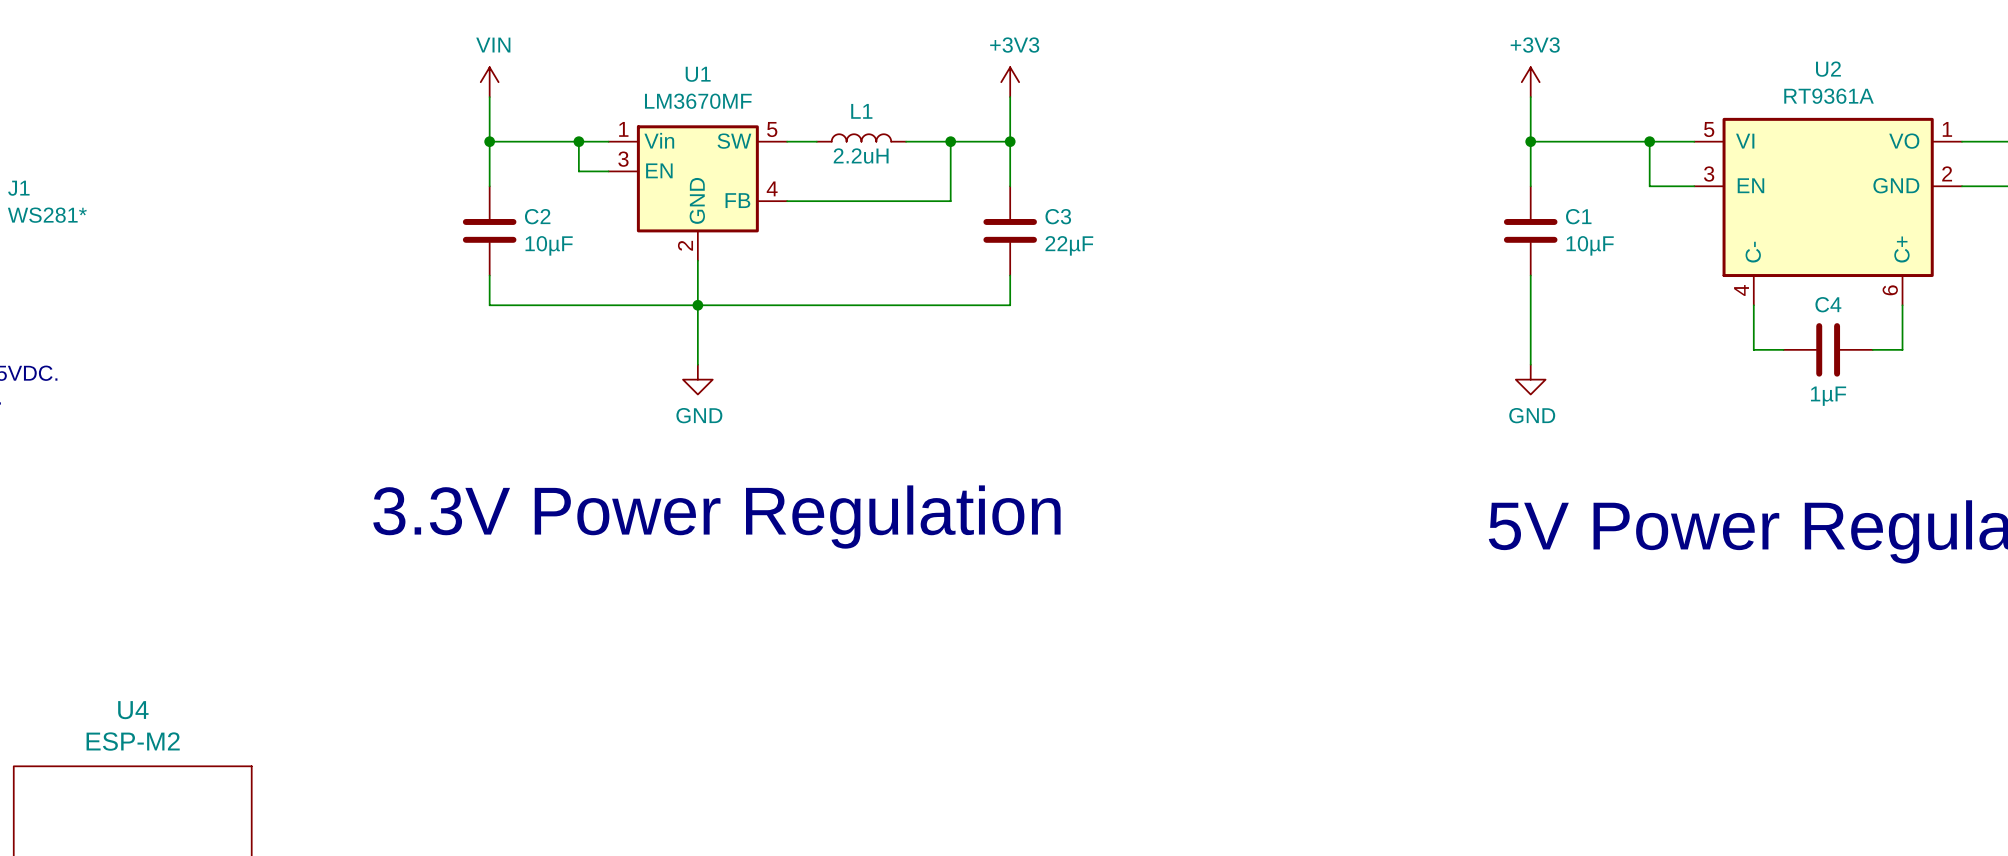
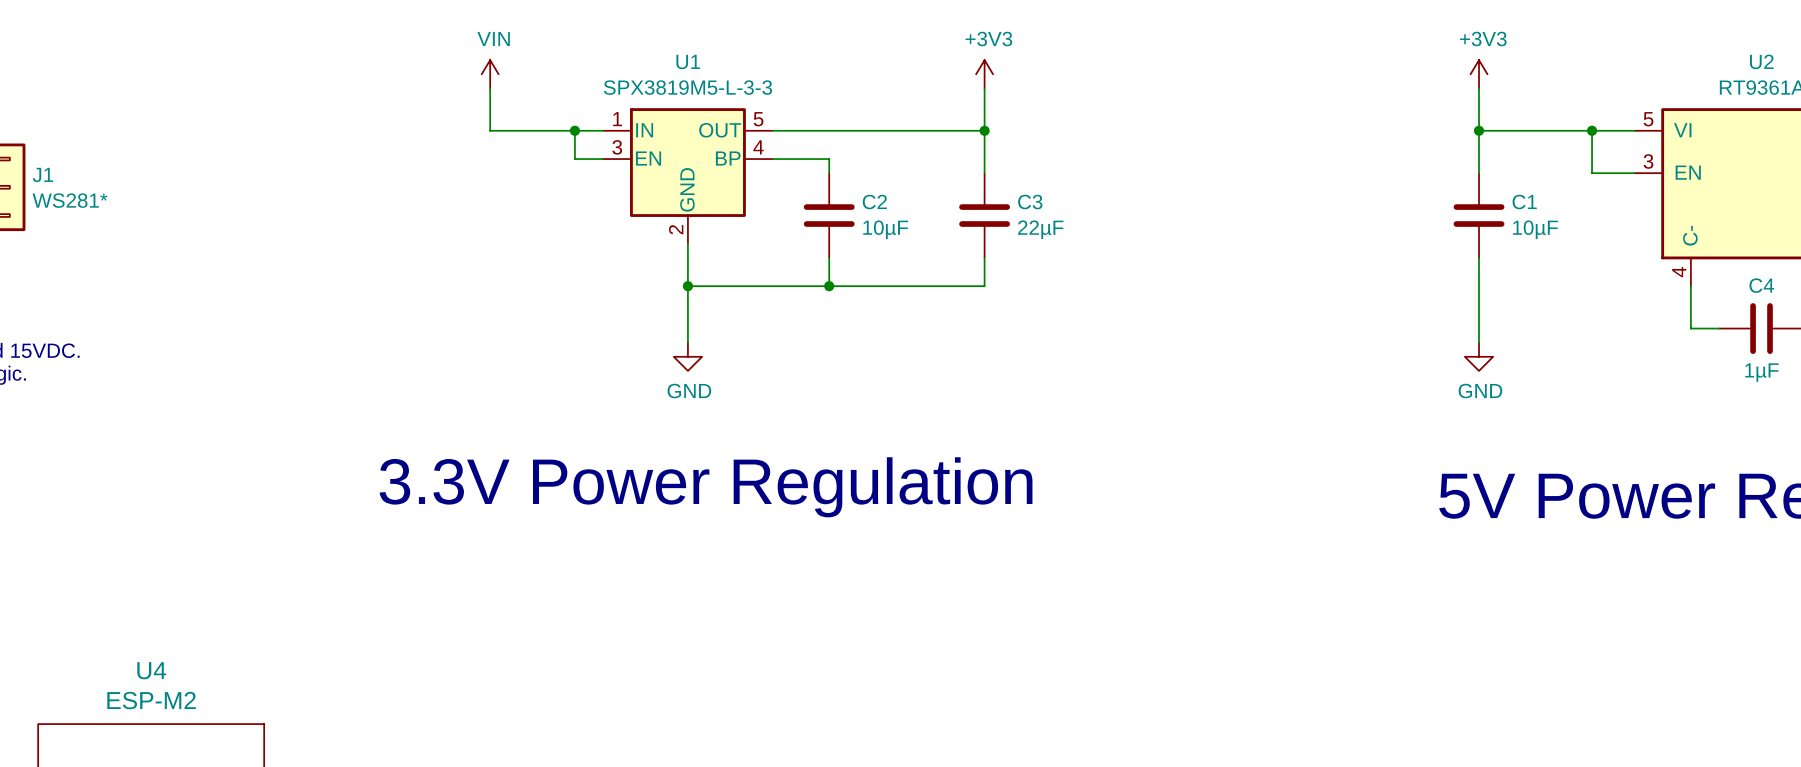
U1 value: LM3670MF (698, 101) -> SPX3819M5-L-3-3 (687, 87)
U1 symbol: [608, 125, 788, 261] -> [603, 108, 773, 244]
L1: 2.2uH (861, 137) -> none
wire: (489, 141) (489, 186) -> none
junction: (489, 141) -> none
wire: none -> (800, 130) (885, 130)
wire: (950, 141) (950, 201) (787, 201) -> none
junction: (950, 141) -> none
wire: none -> (772, 159) (829, 159) (829, 173)
C2 position: (489, 230) -> (829, 215)
wire: (489, 275) (489, 305) (697, 305) -> none
wire: none -> (829, 257) (829, 286)
junction: none -> (829, 286)

